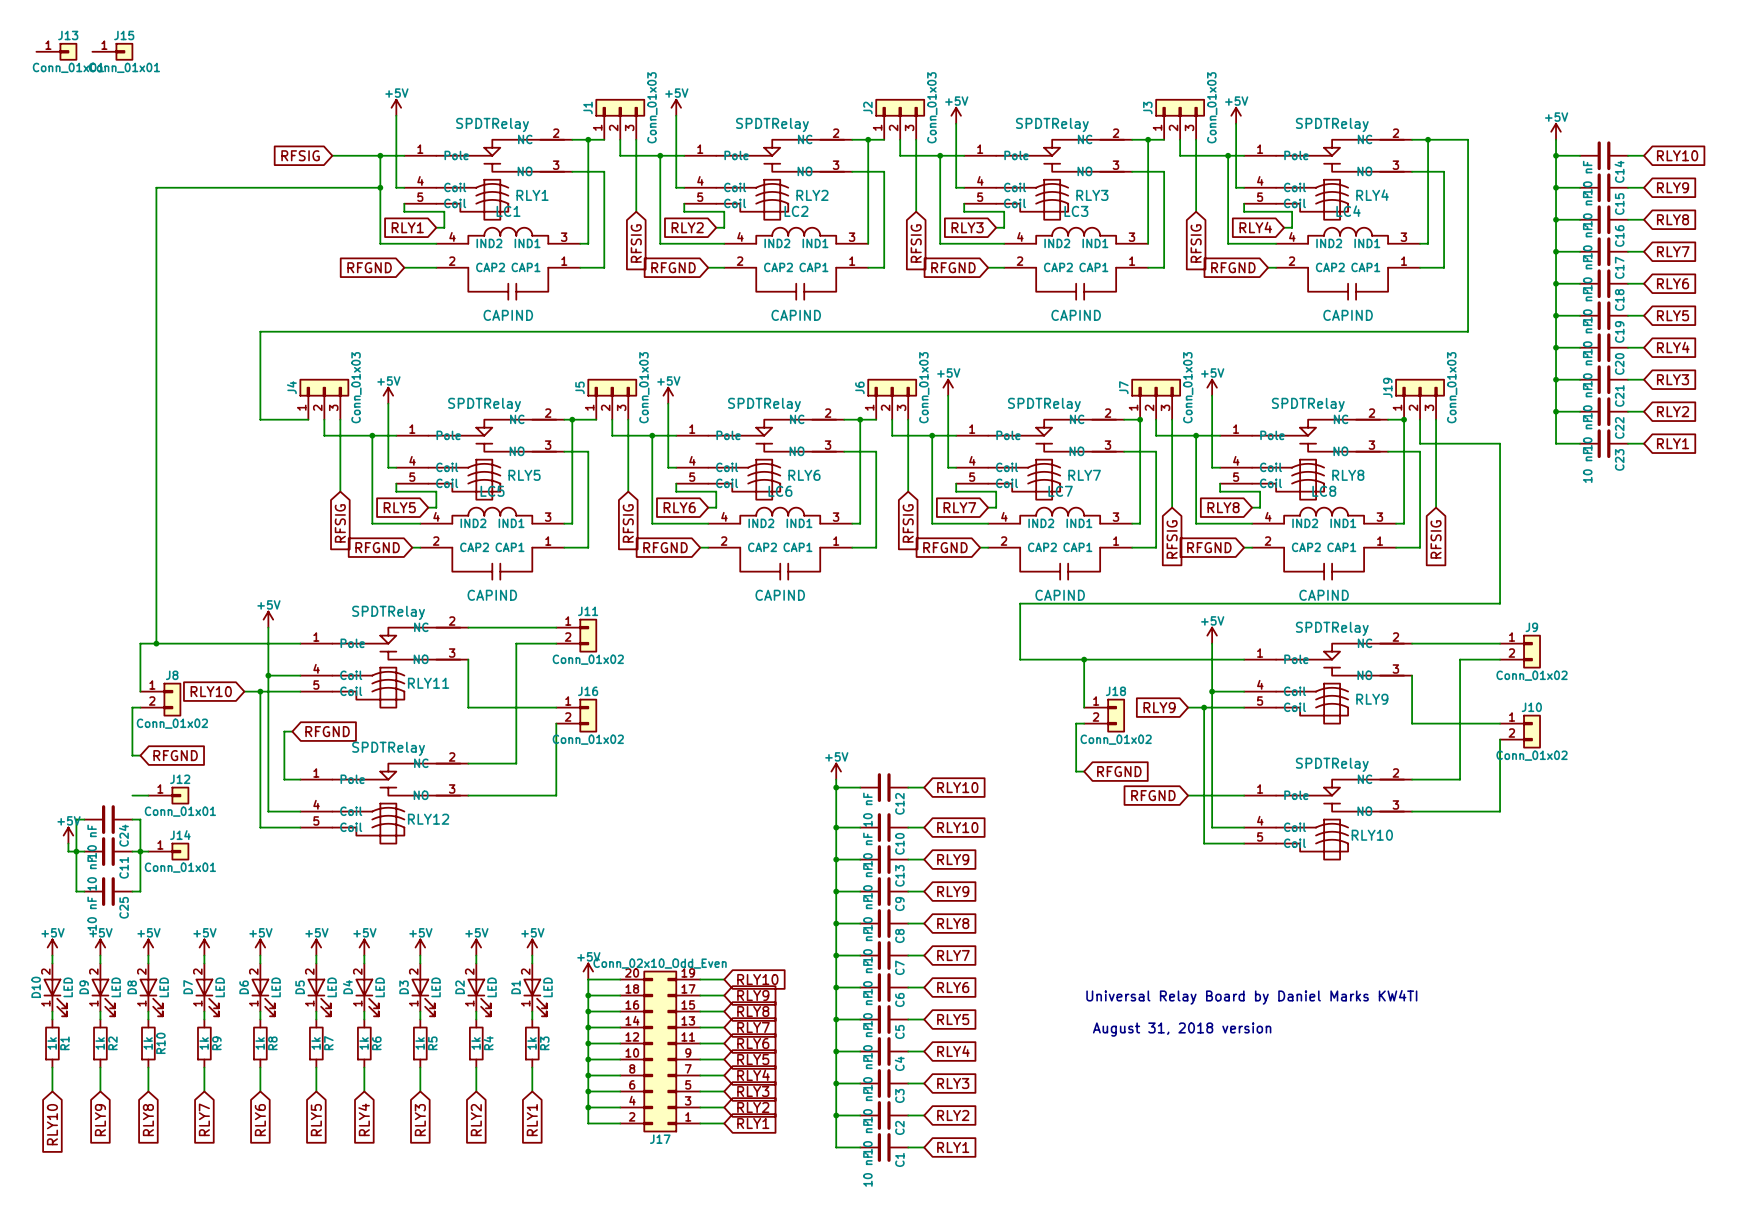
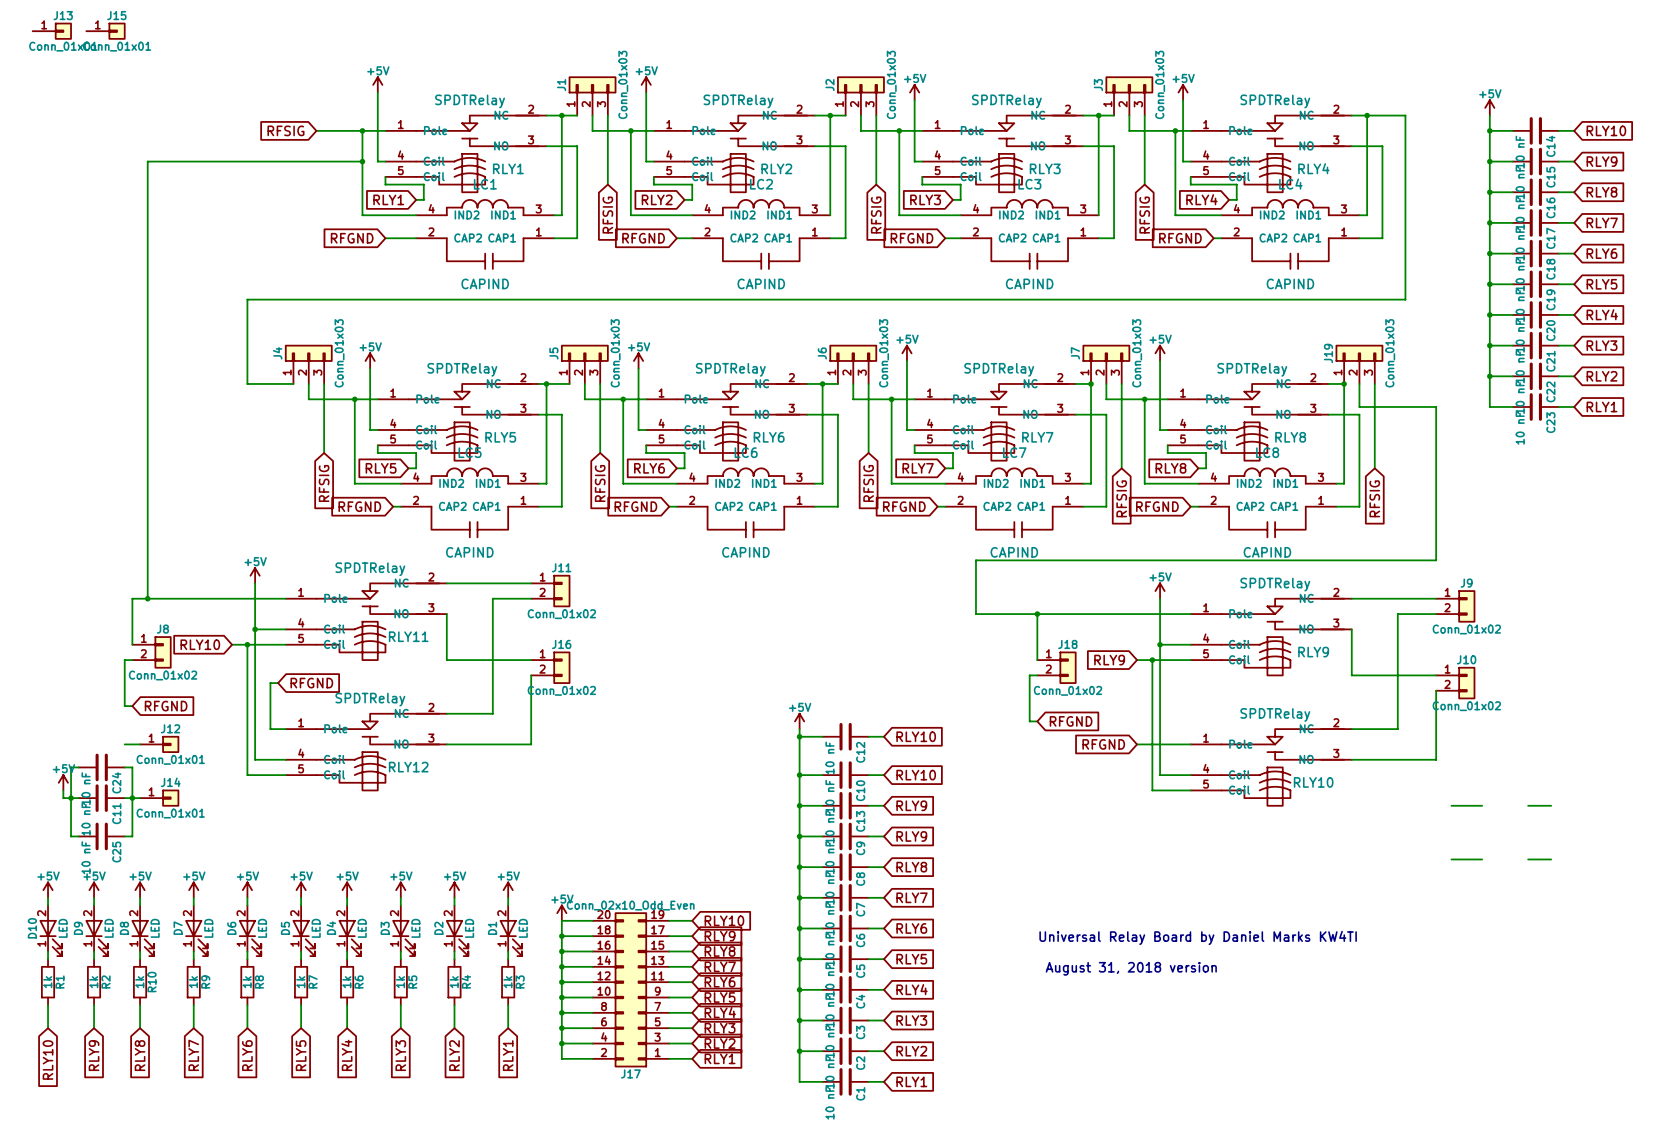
wire: none -> (1451, 805) (1482, 805)
wire: none -> (1528, 805) (1551, 805)
wire: none -> (1451, 859) (1482, 859)
wire: none -> (1528, 859) (1551, 859)

